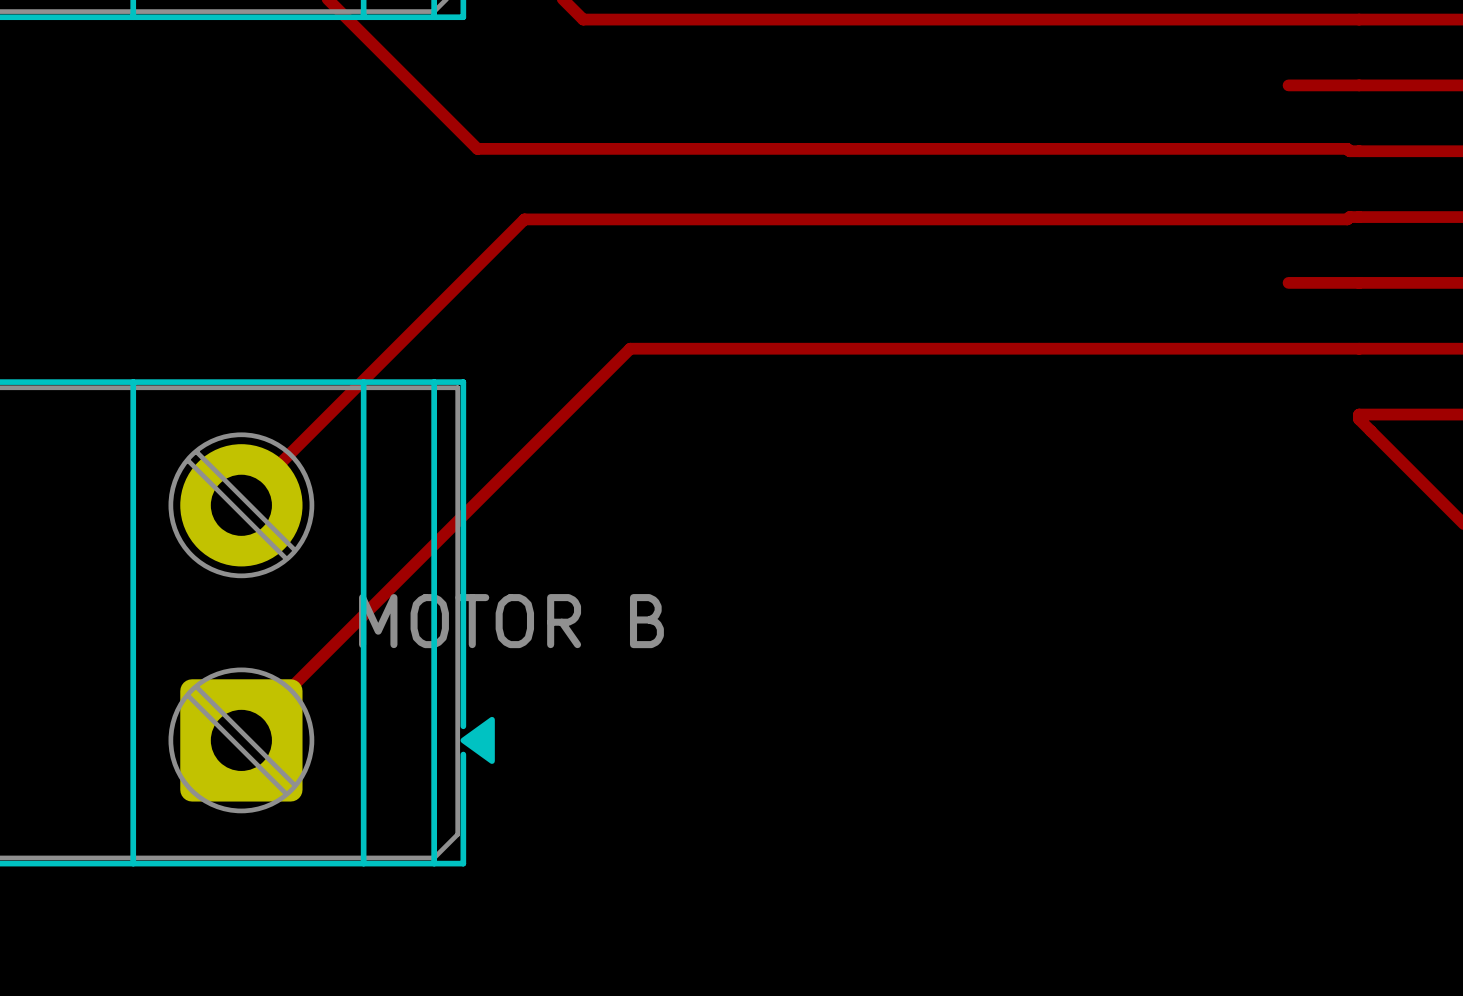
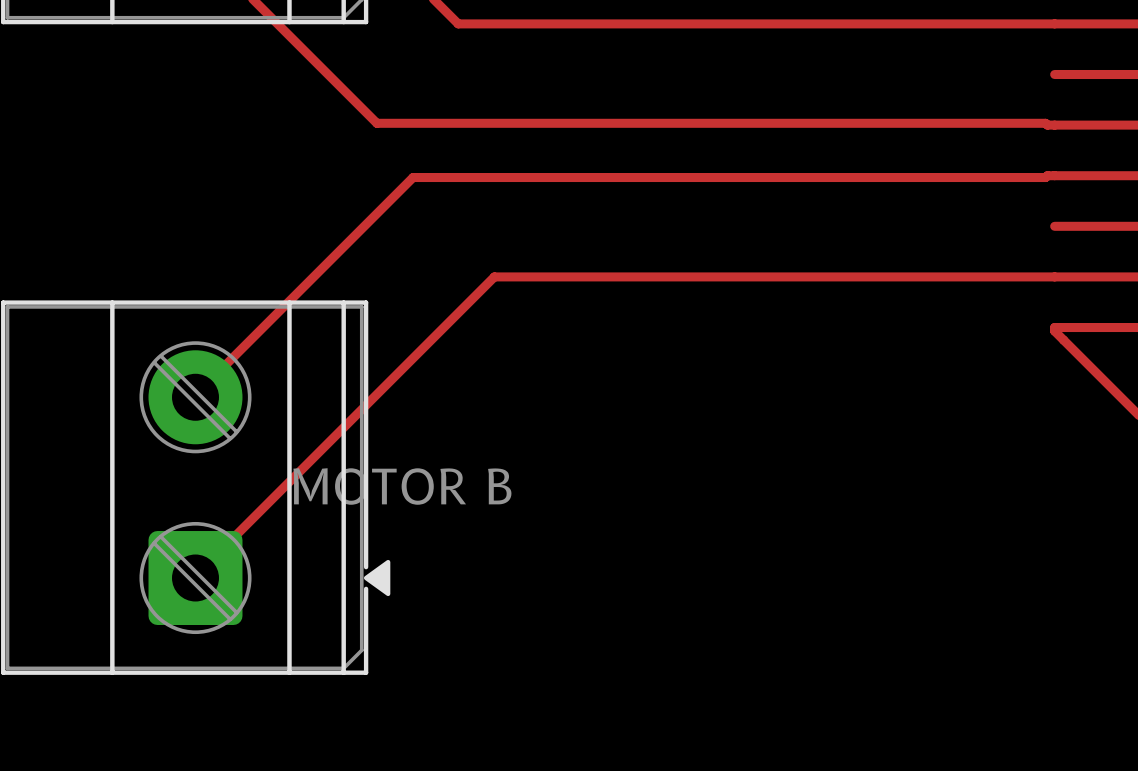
track: (1288, 85) (1359, 85) -> none
track: (1288, 282) (1359, 282) -> none

